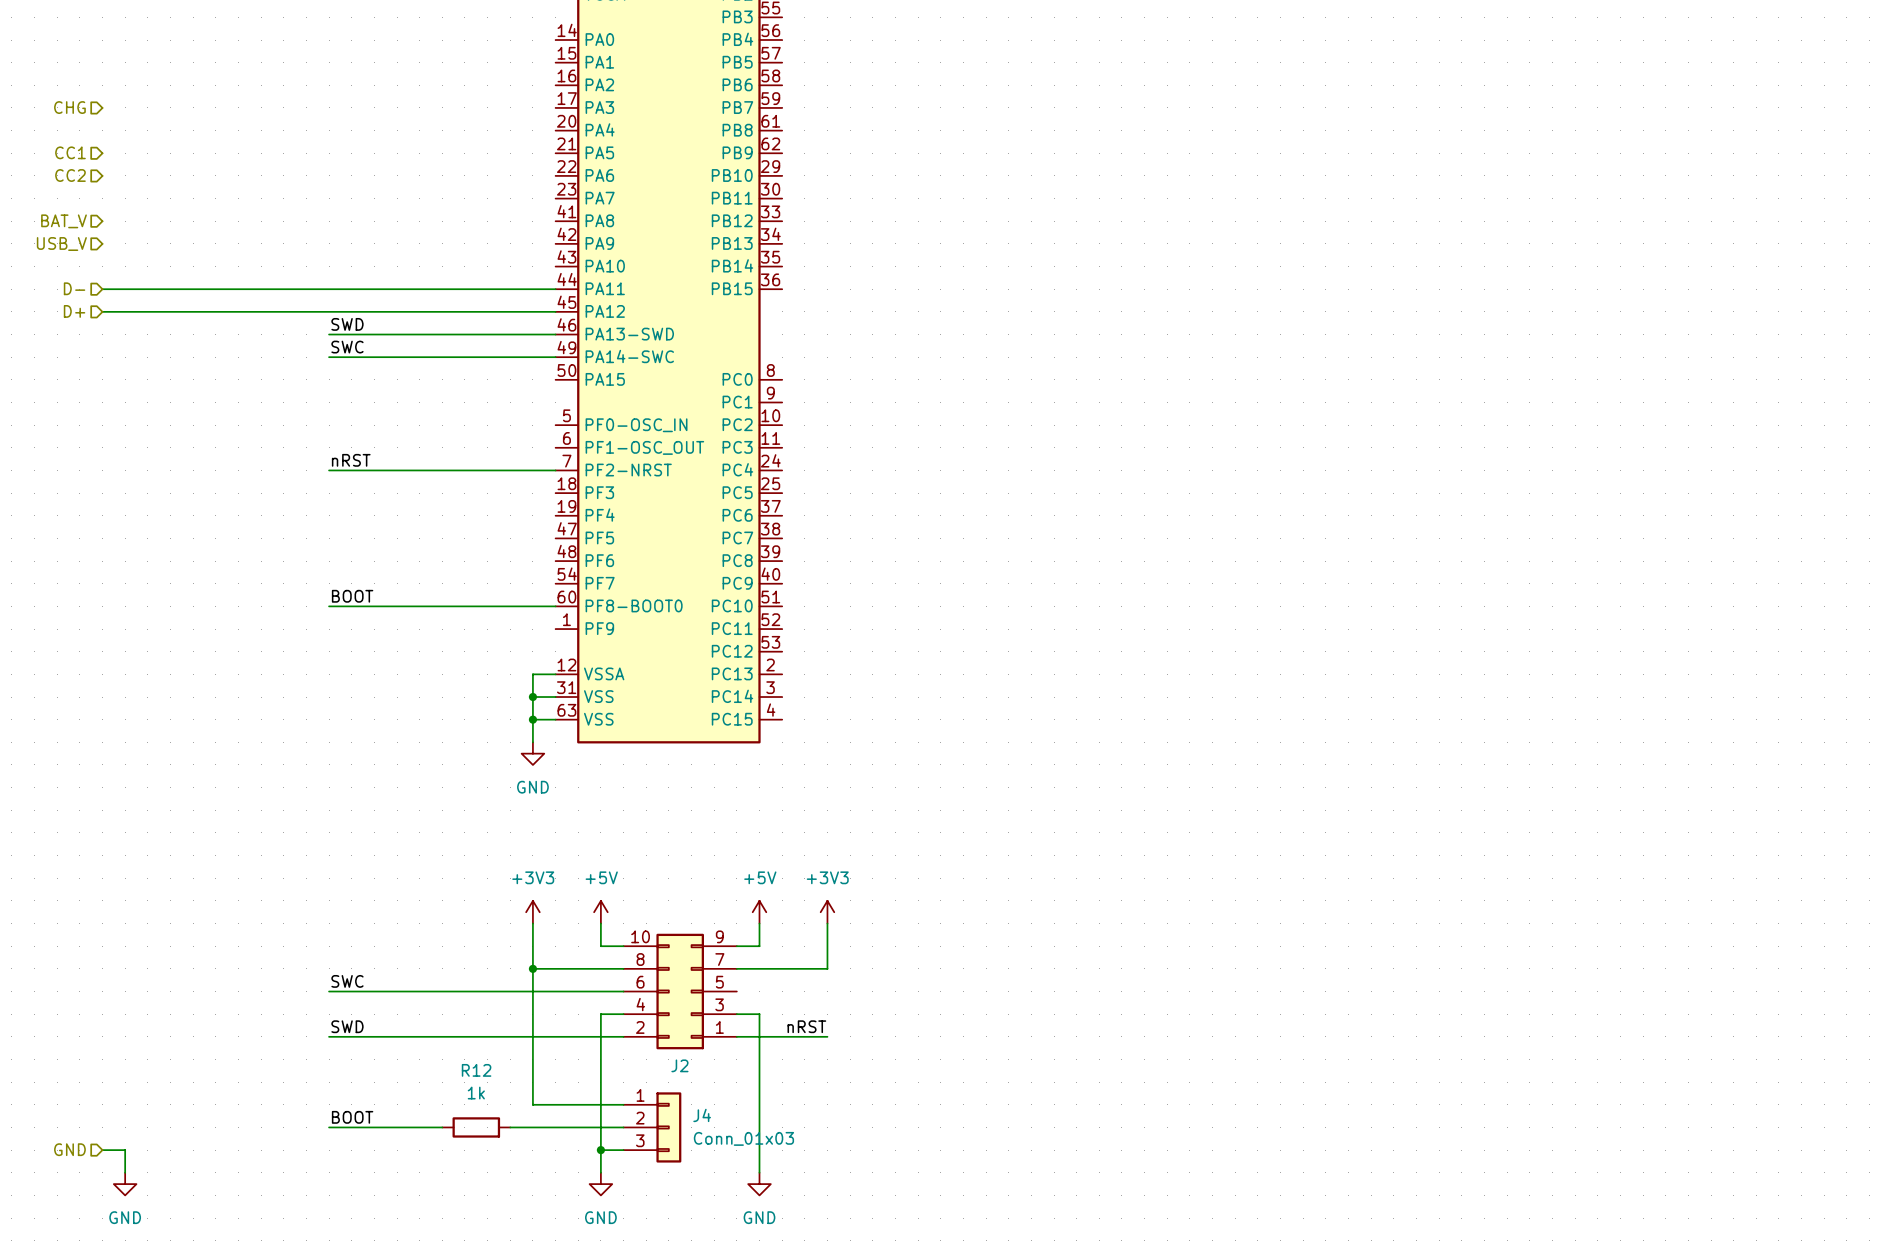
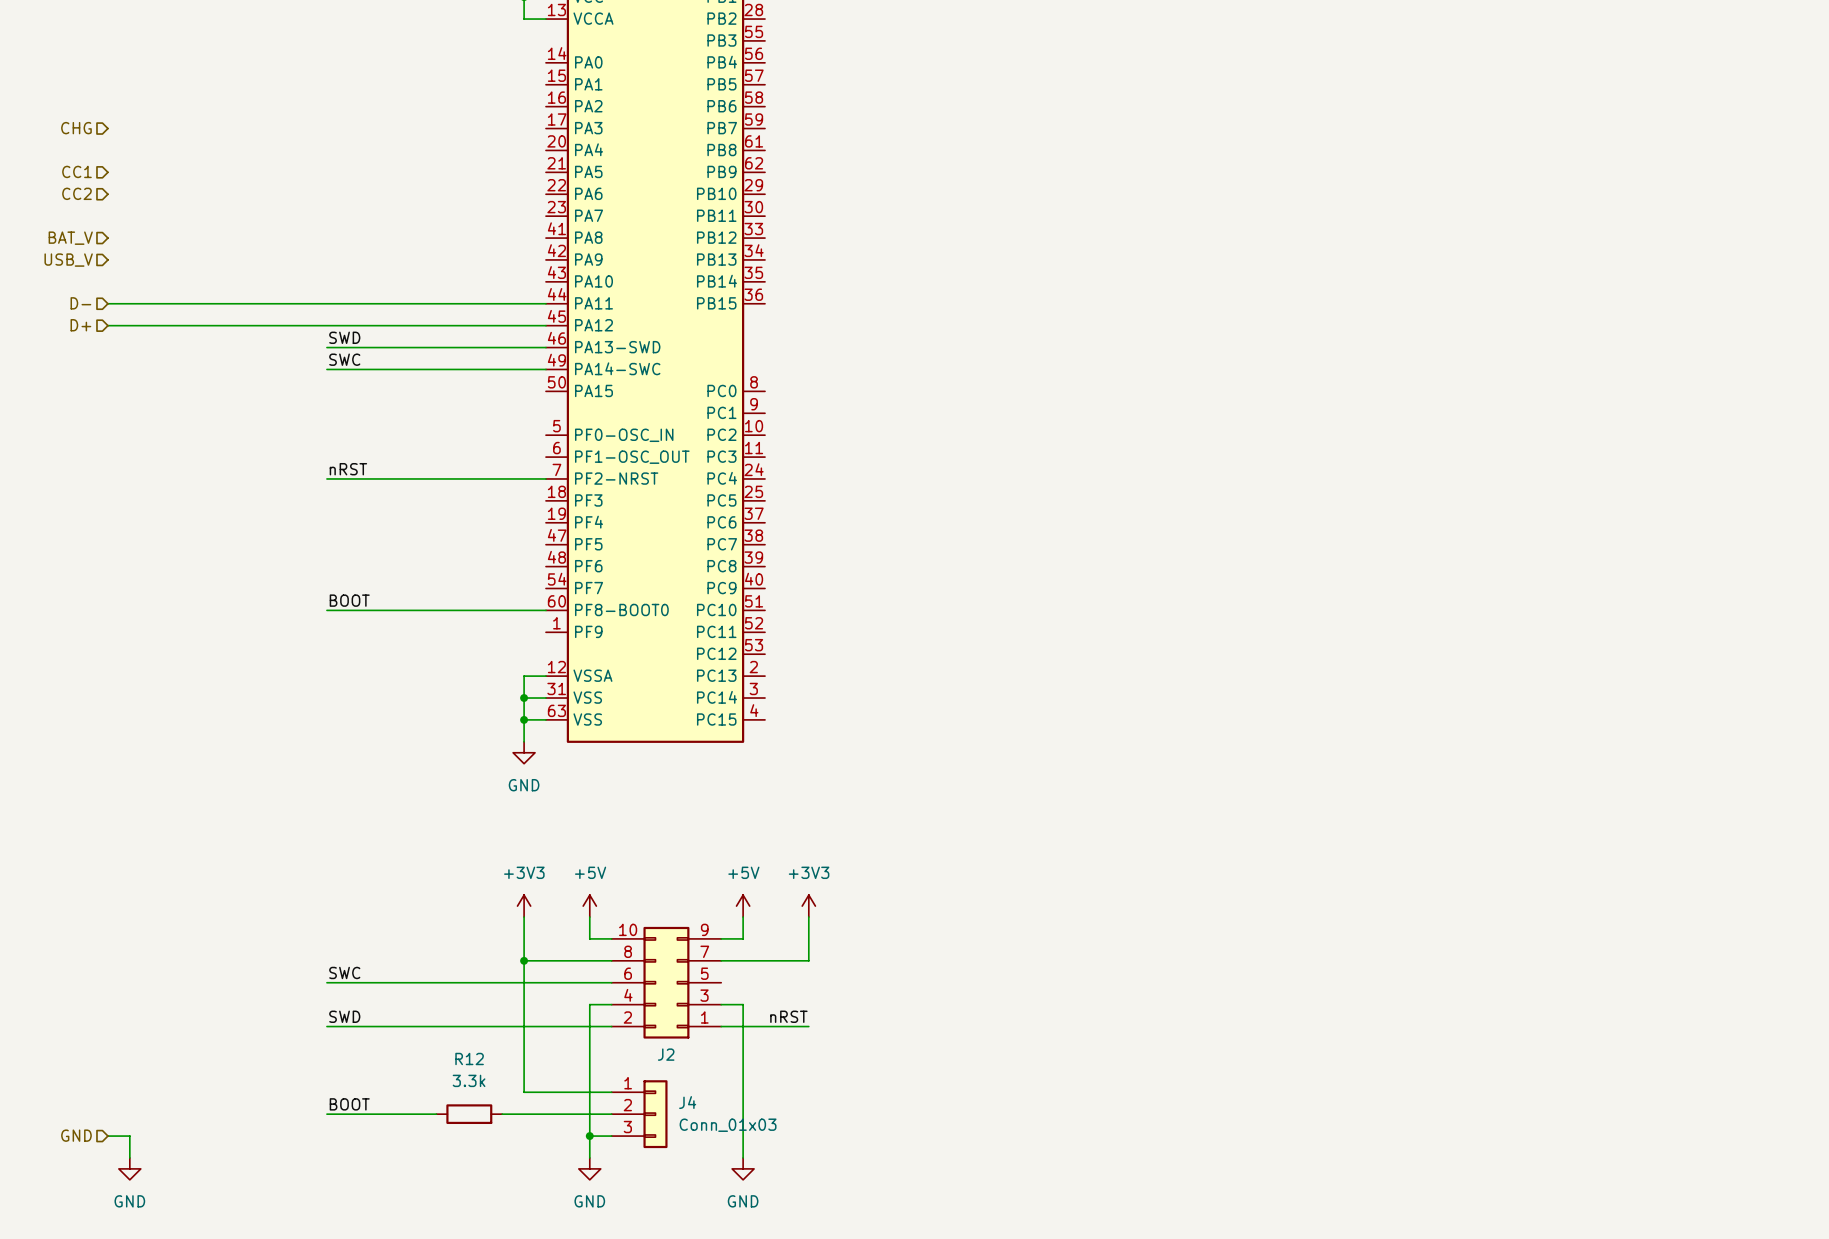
R12 value: 1k (476, 1093) -> 3.3k (469, 1080)

